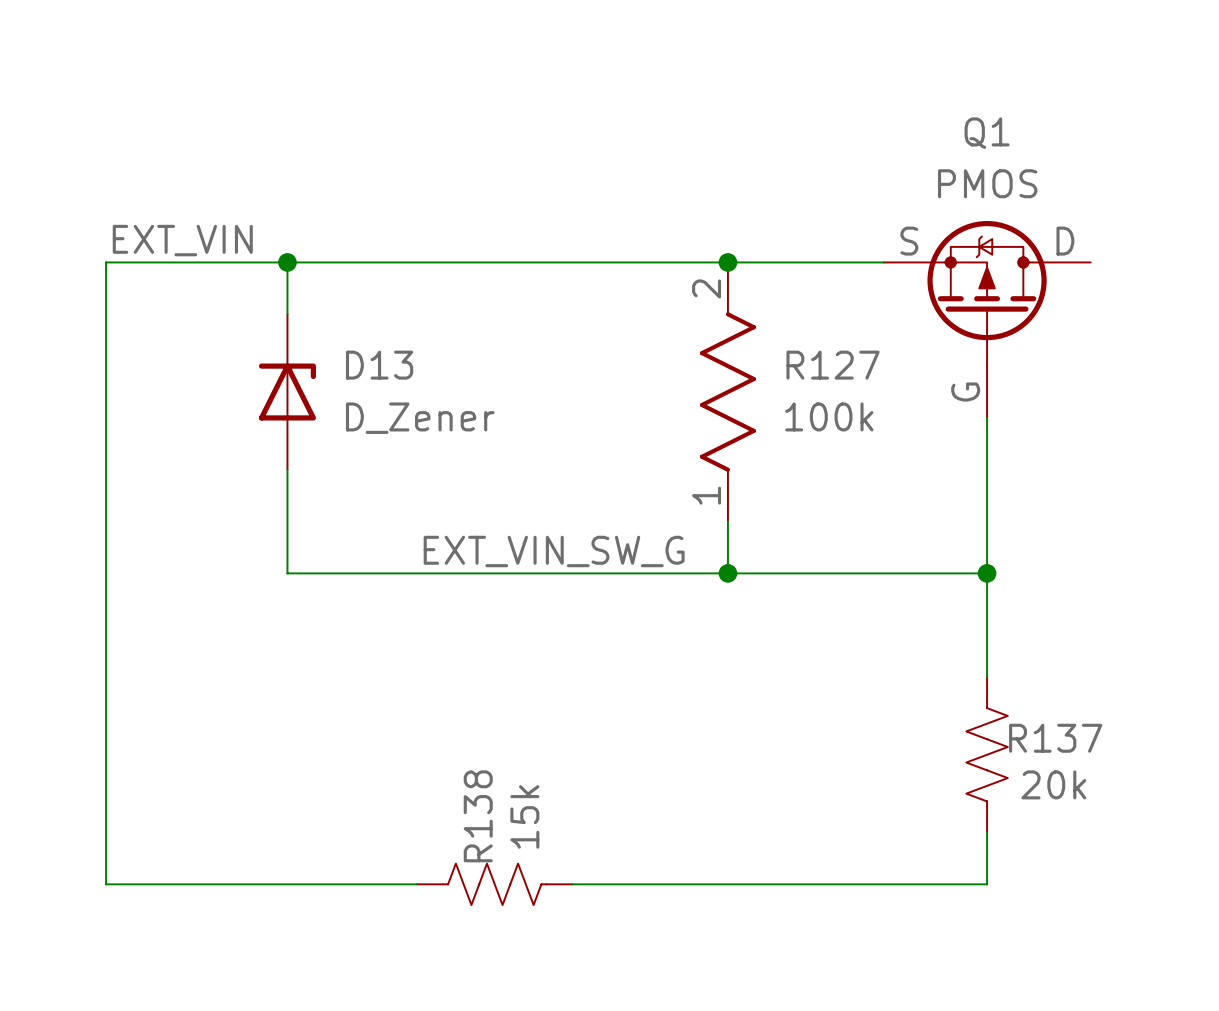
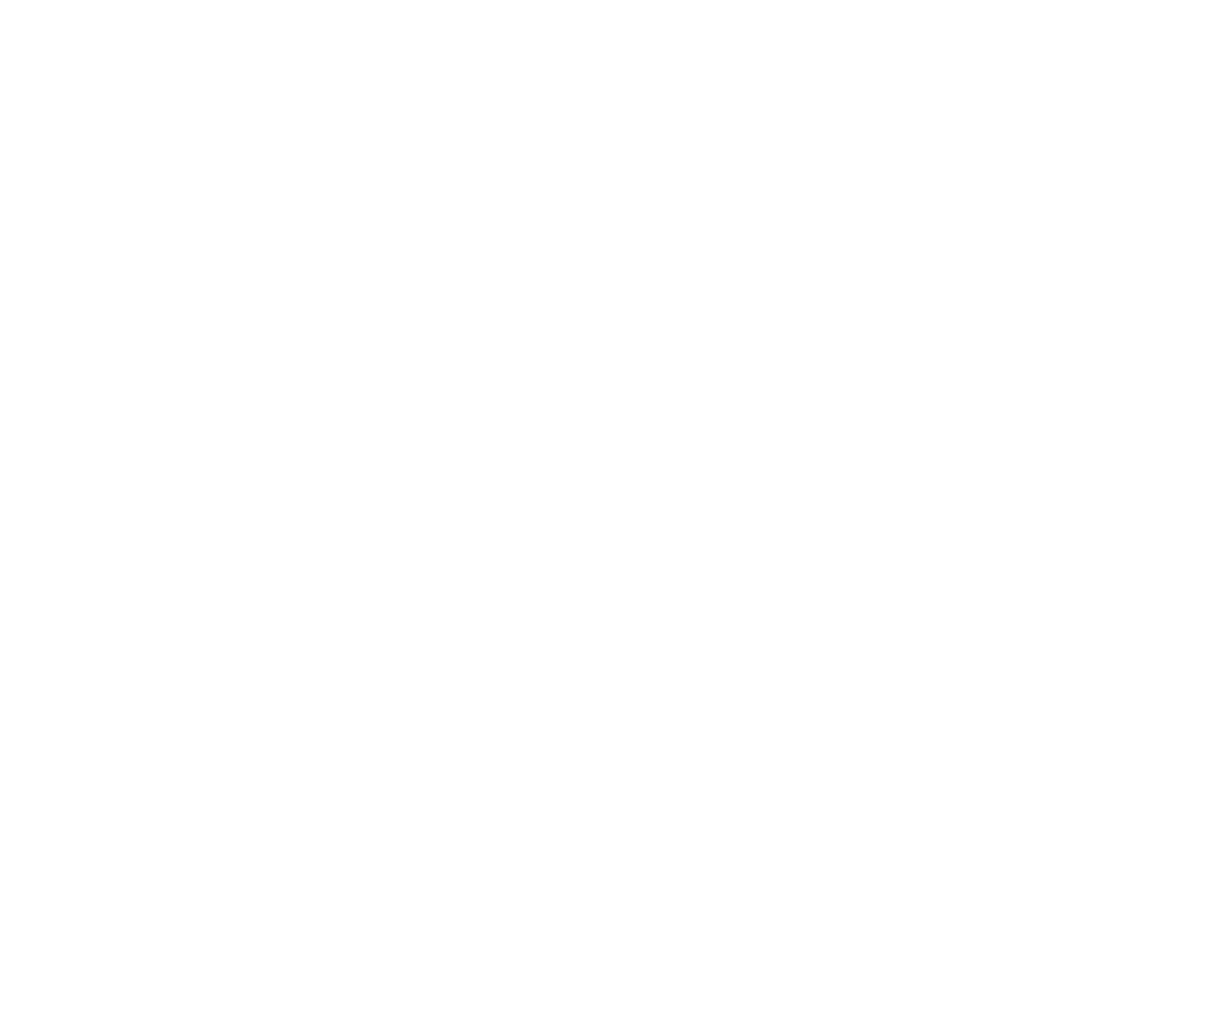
label: EXT_VIN (182, 240) -> none
wire: (287, 262) (287, 314) -> none
junction: (287, 262) -> none
junction: (727, 262) -> none
wire: (883, 262) (106, 262) (106, 884) (417, 884) -> none
Q1: PMOS (987, 319) -> none
D13: D_Zener (287, 392) -> none
R127: 100k (727, 392) -> none
wire: (987, 417) (987, 677) -> none
wire: (287, 469) (287, 573) (987, 573) -> none
wire: (727, 521) (727, 573) -> none
label: EXT_VIN_SW_G (554, 551) -> none
junction: (727, 573) -> none
junction: (987, 573) -> none
R137: 20k (987, 754) -> none
wire: (987, 832) (987, 884) (572, 884) -> none
R138: 15k (494, 884) -> none

